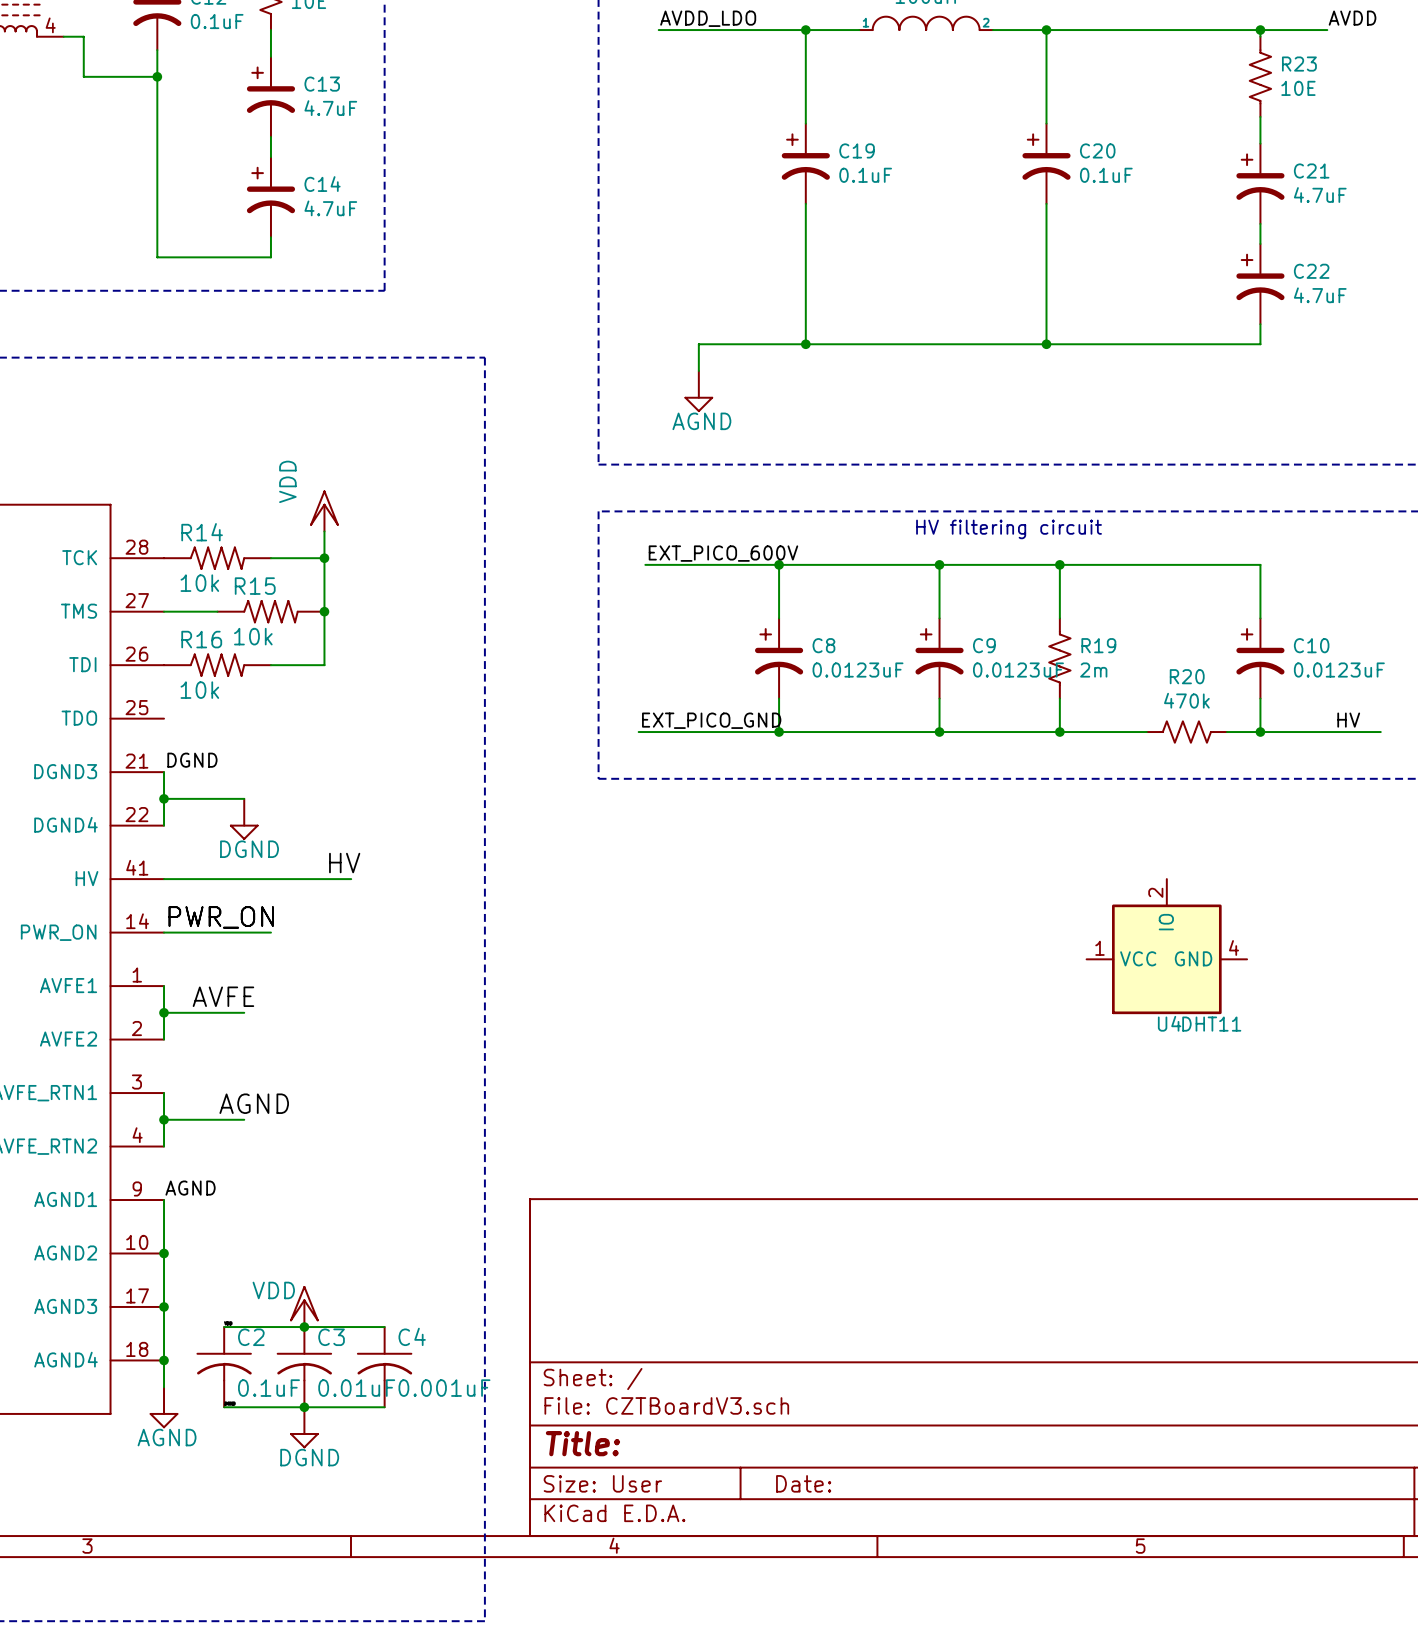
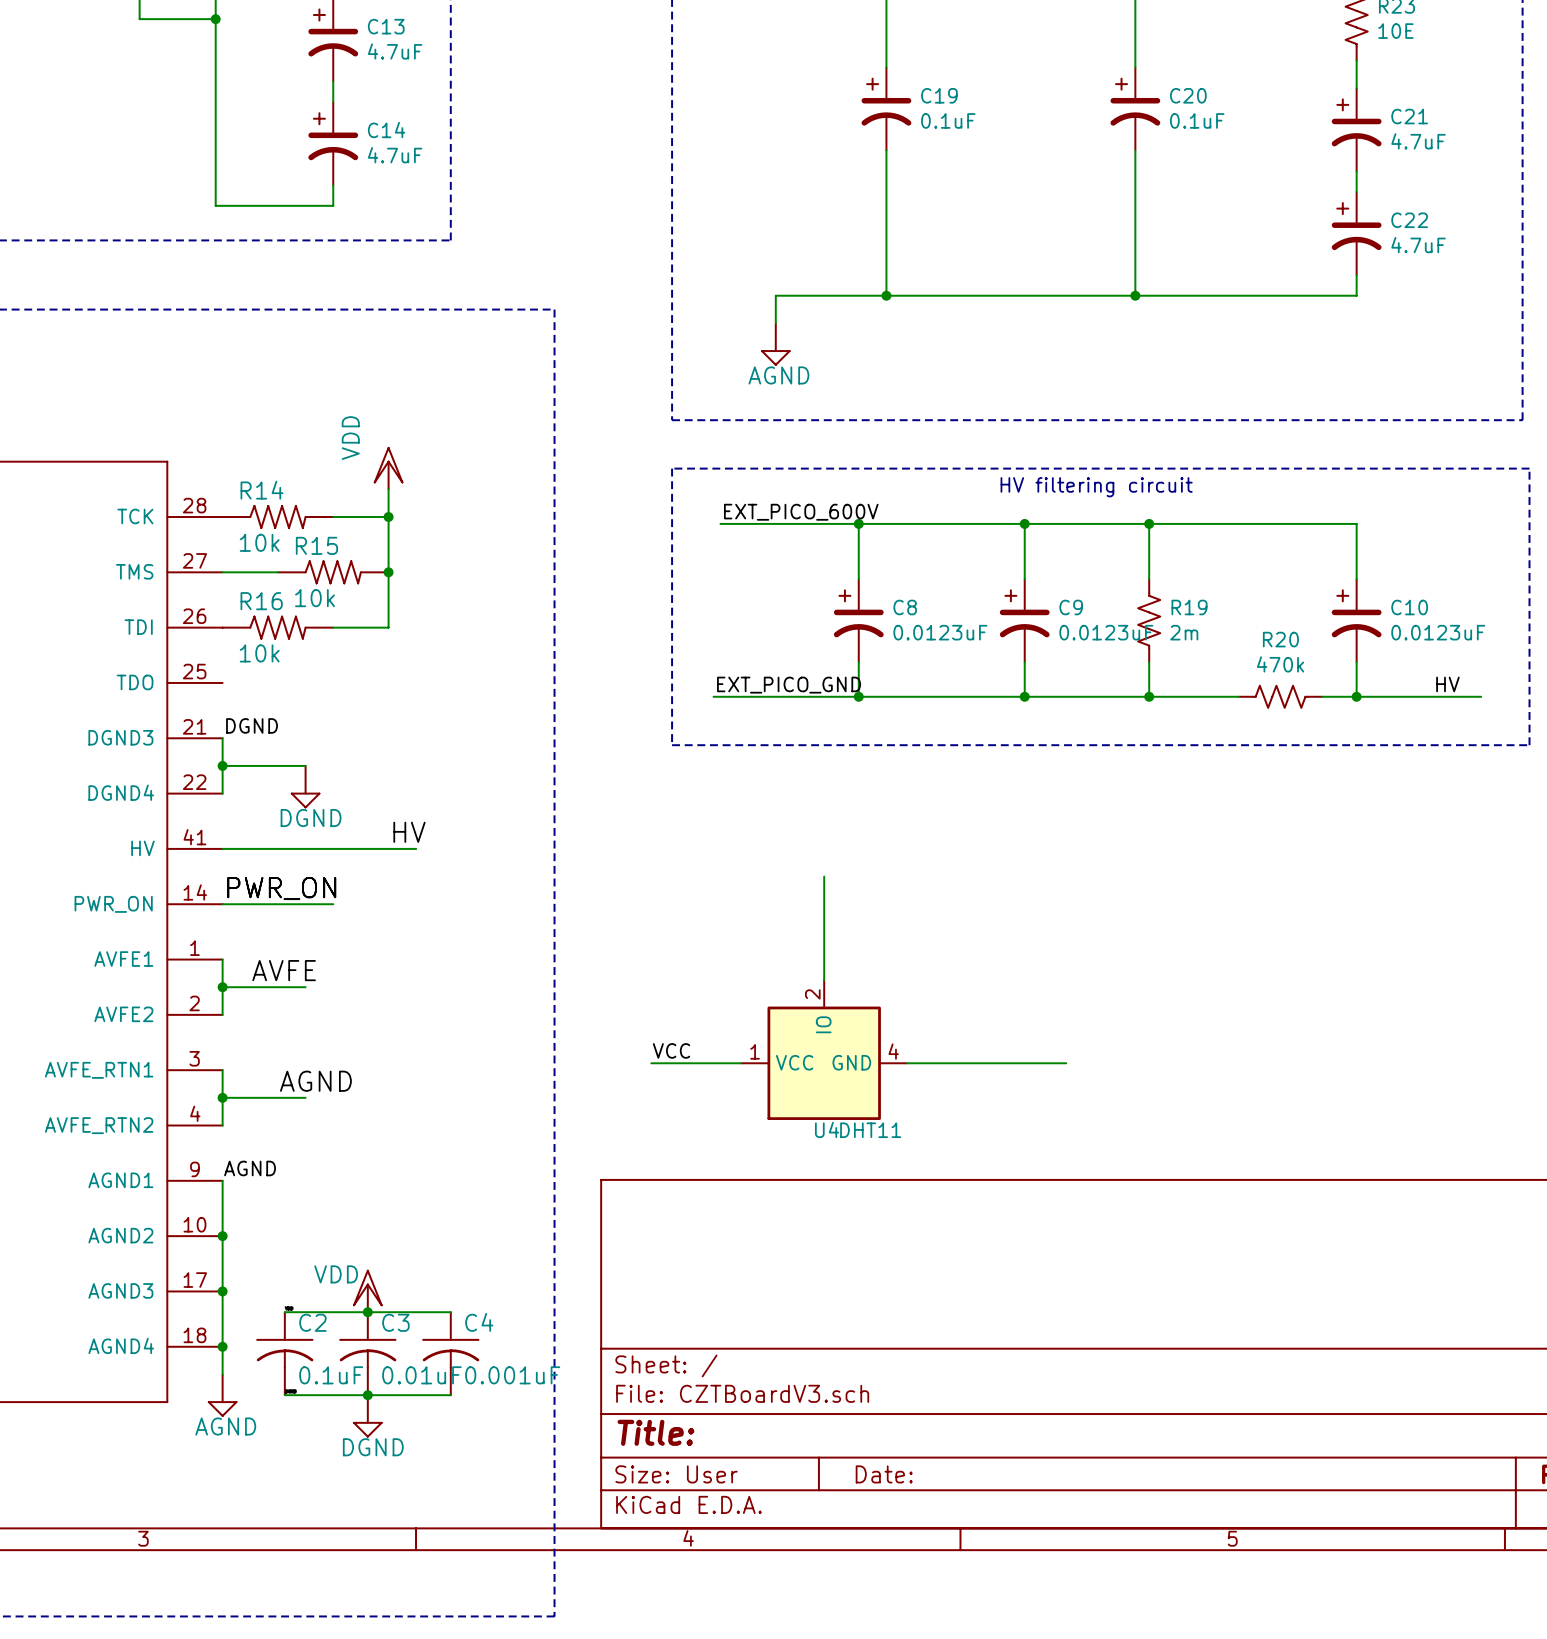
wire: none -> (824, 876) (824, 980)
U4 position: (1166, 946) -> (824, 1050)
label: none -> VCC (671, 1050)
wire: none -> (651, 1063) (741, 1063)
wire: none -> (907, 1063) (1066, 1063)

